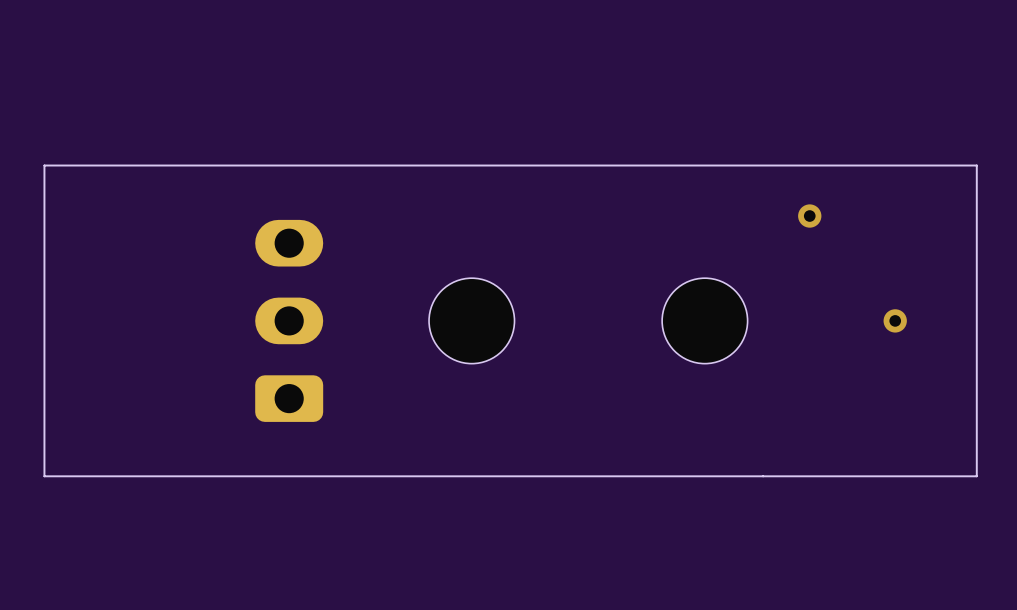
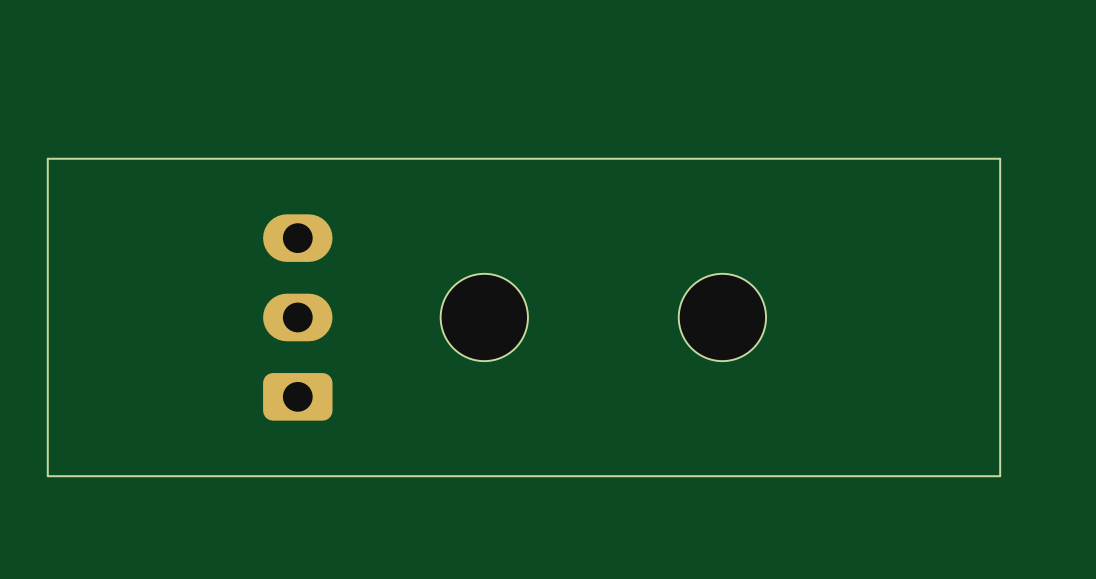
via: (809, 216) -> none
via: (895, 320) -> none

